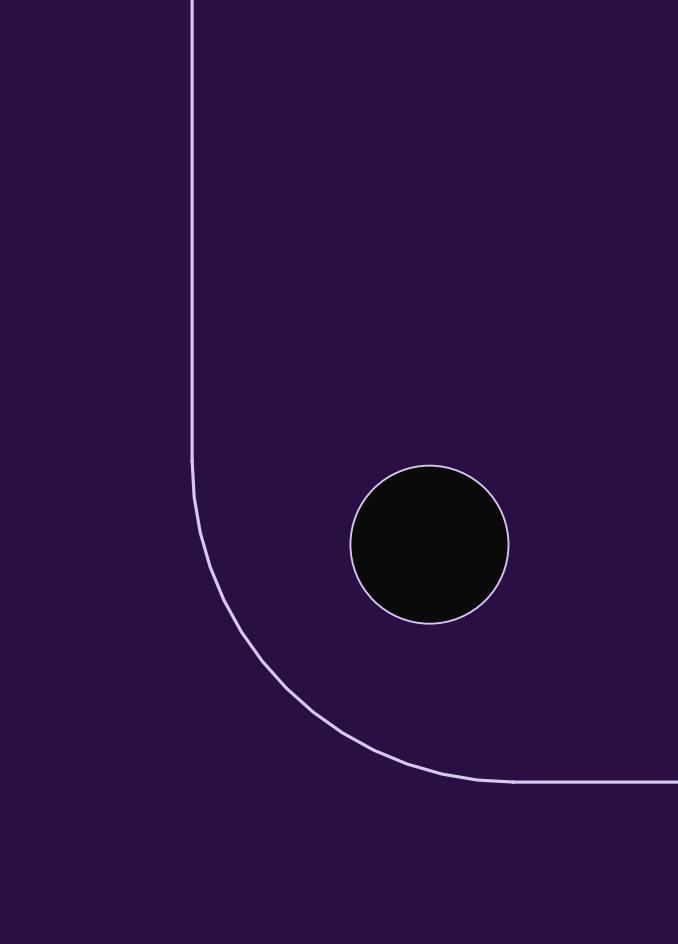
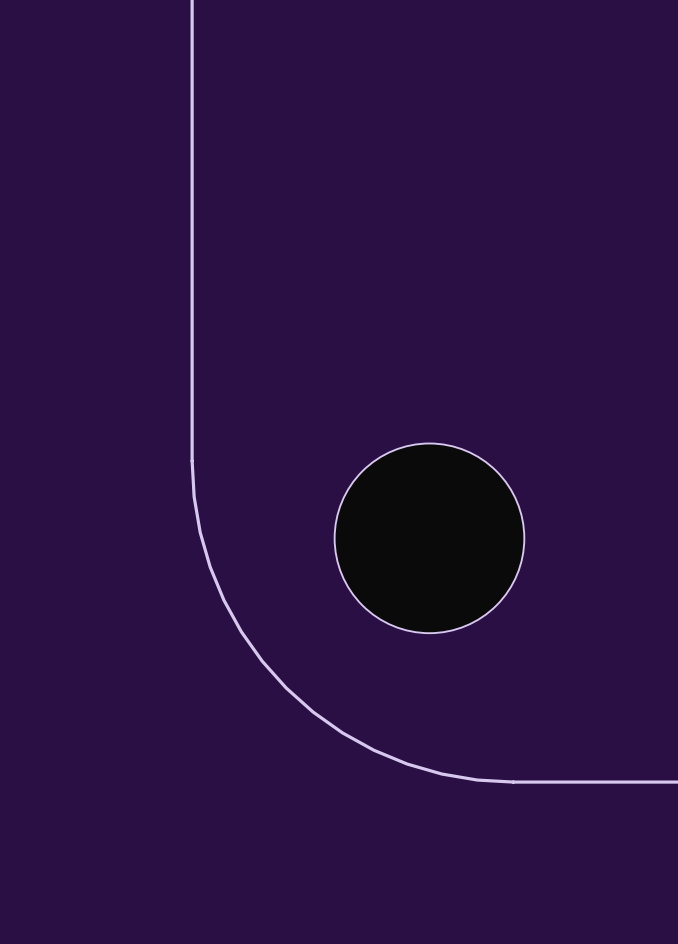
part footprint: [350, 465, 509, 624] -> [334, 443, 525, 634]

